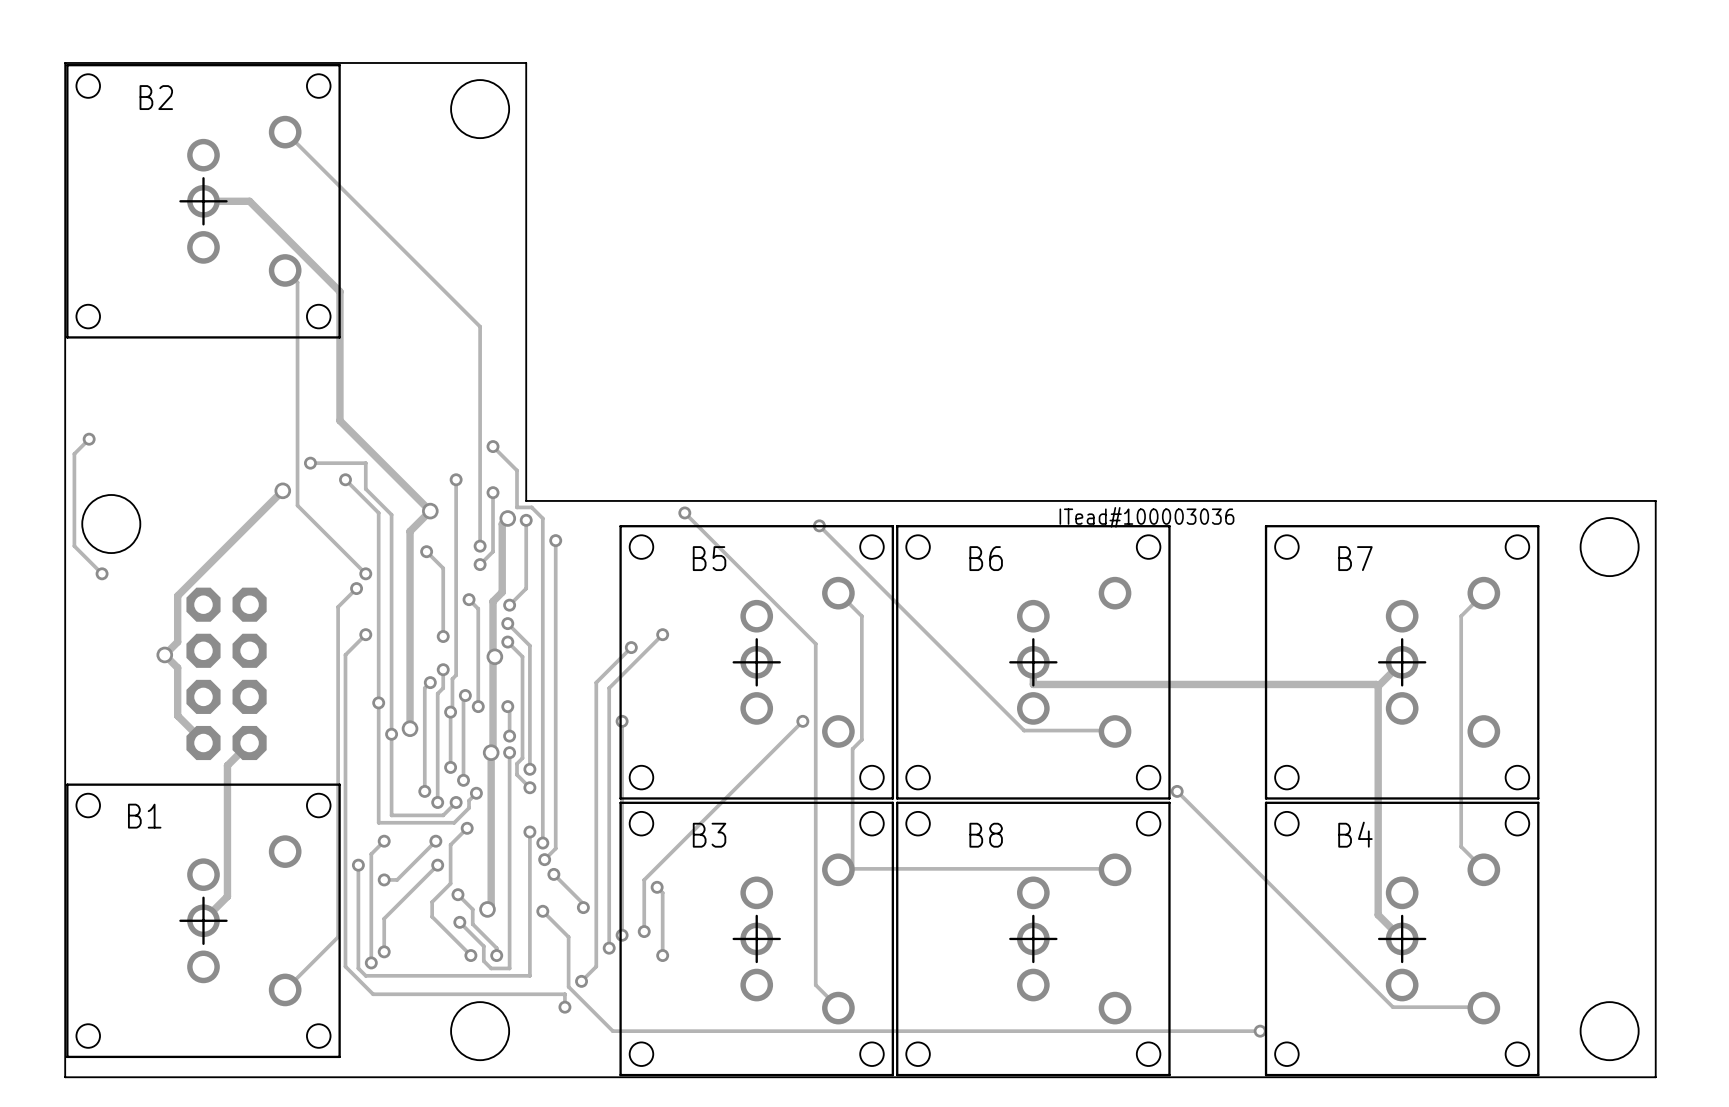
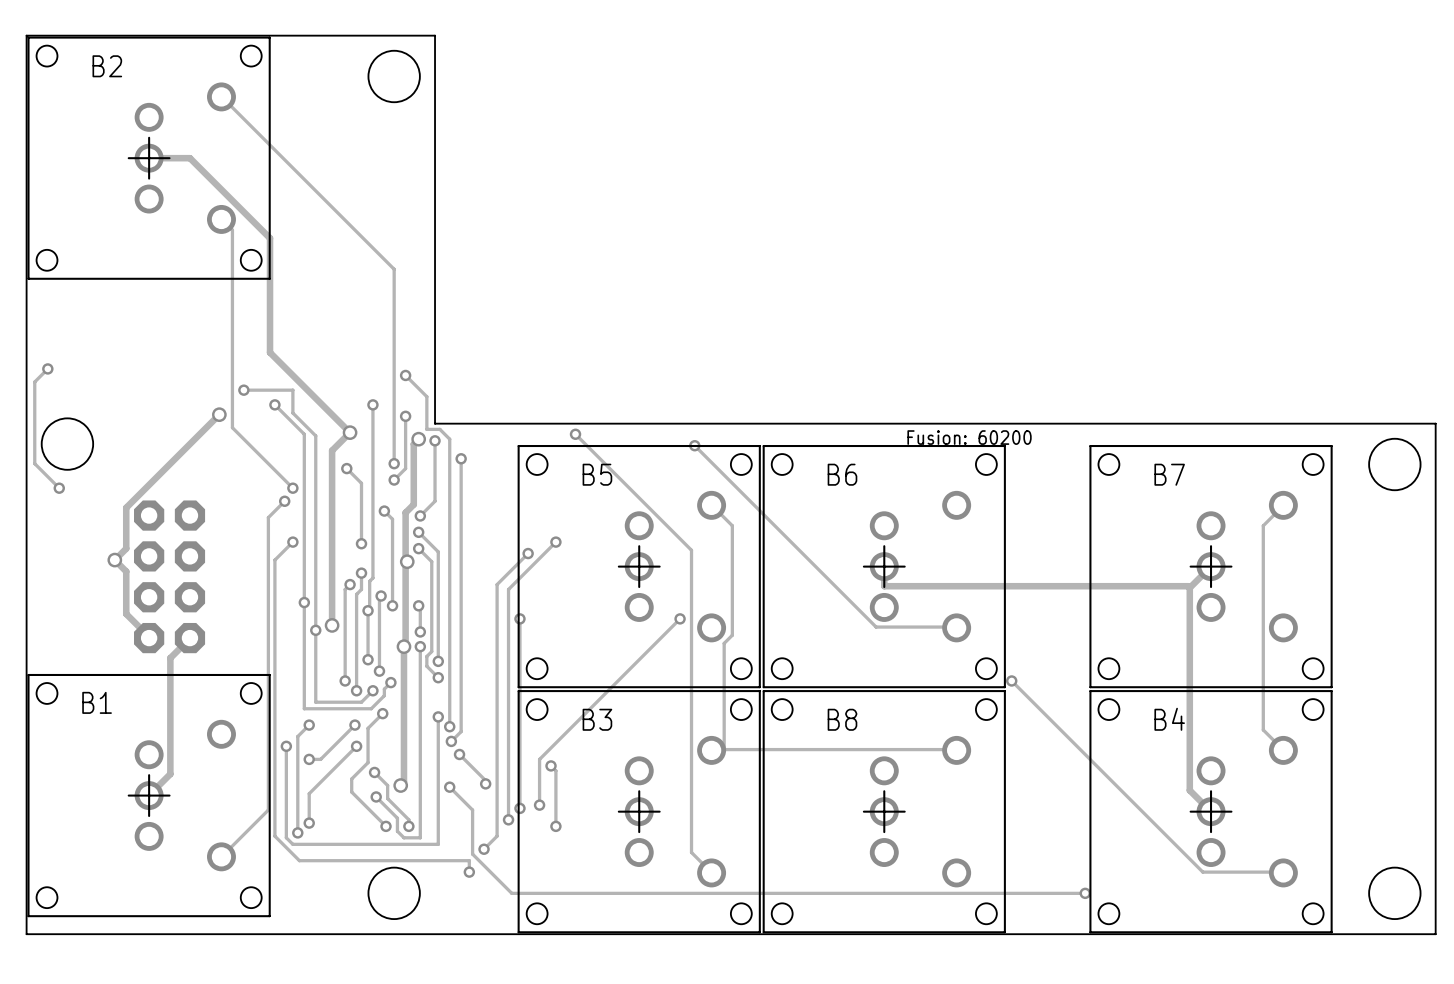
text: ITead#100003036 (1146, 517) -> Fusion: 60200 (969, 437)

